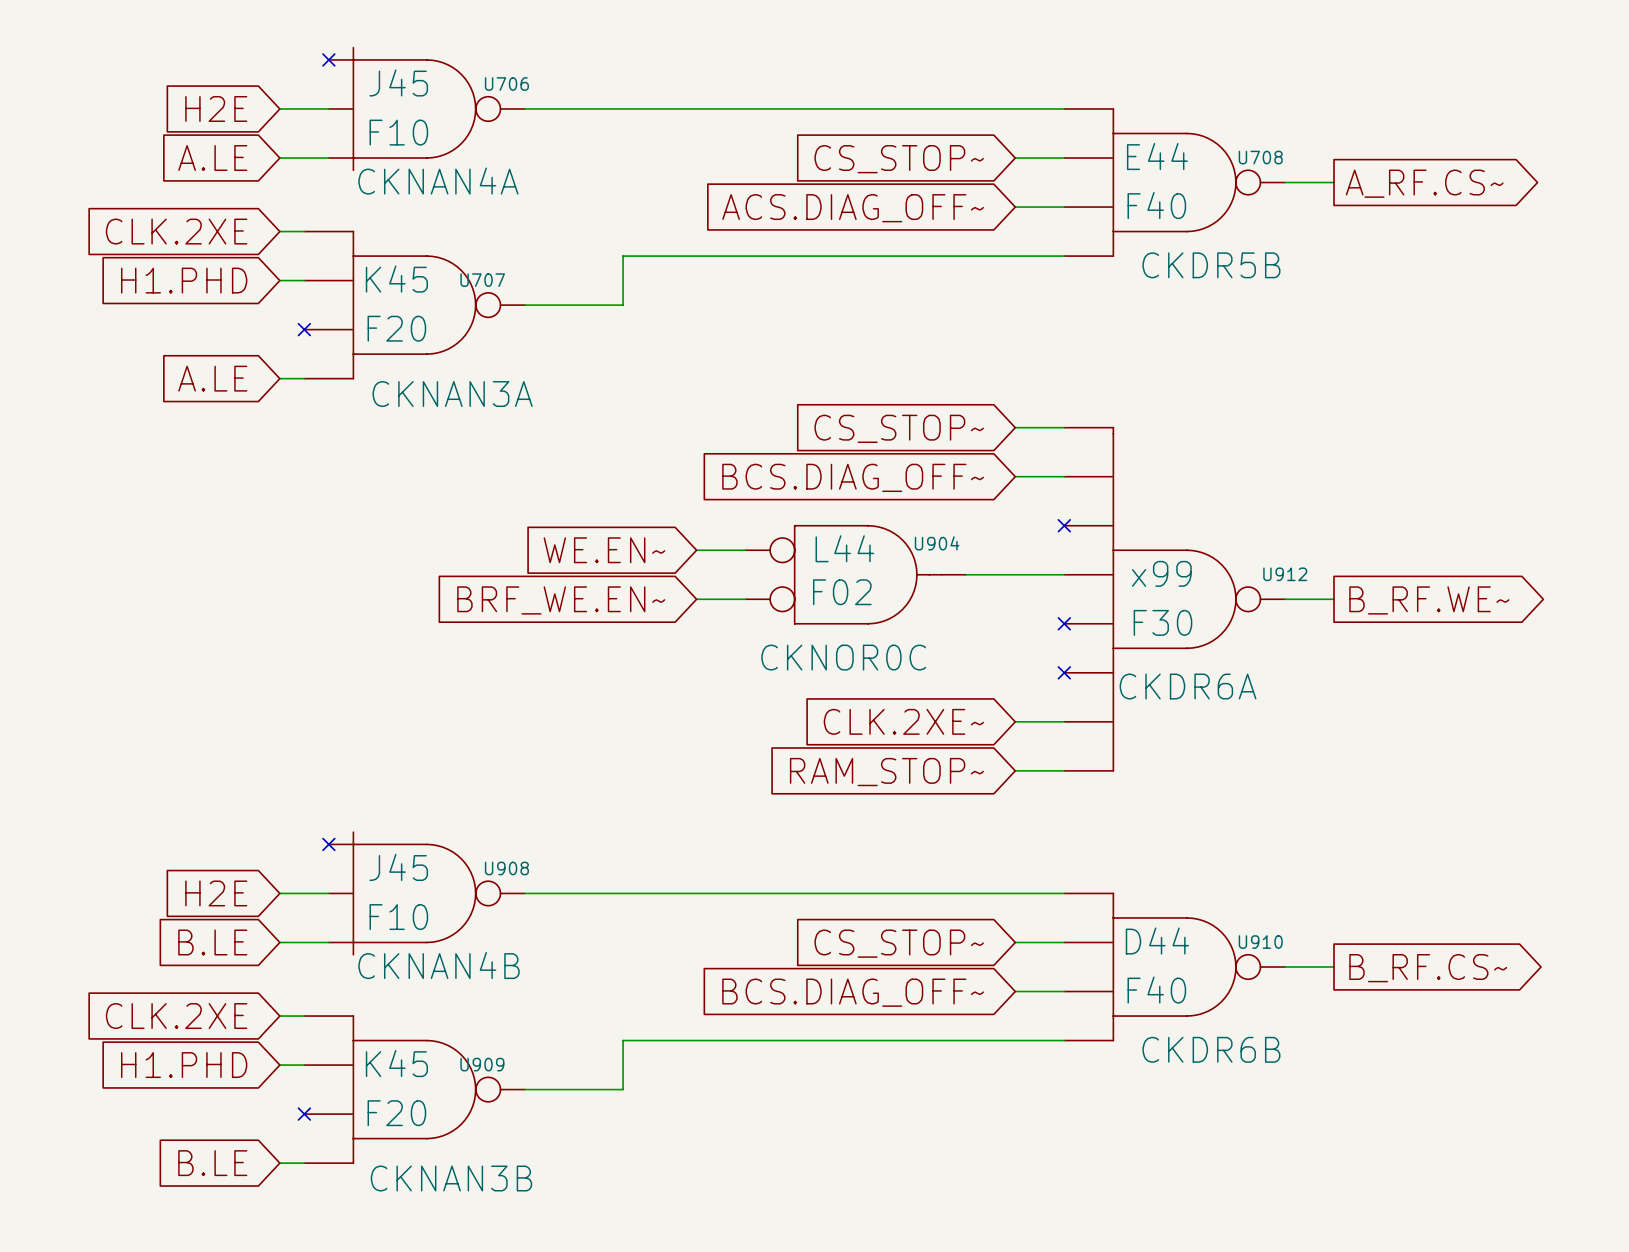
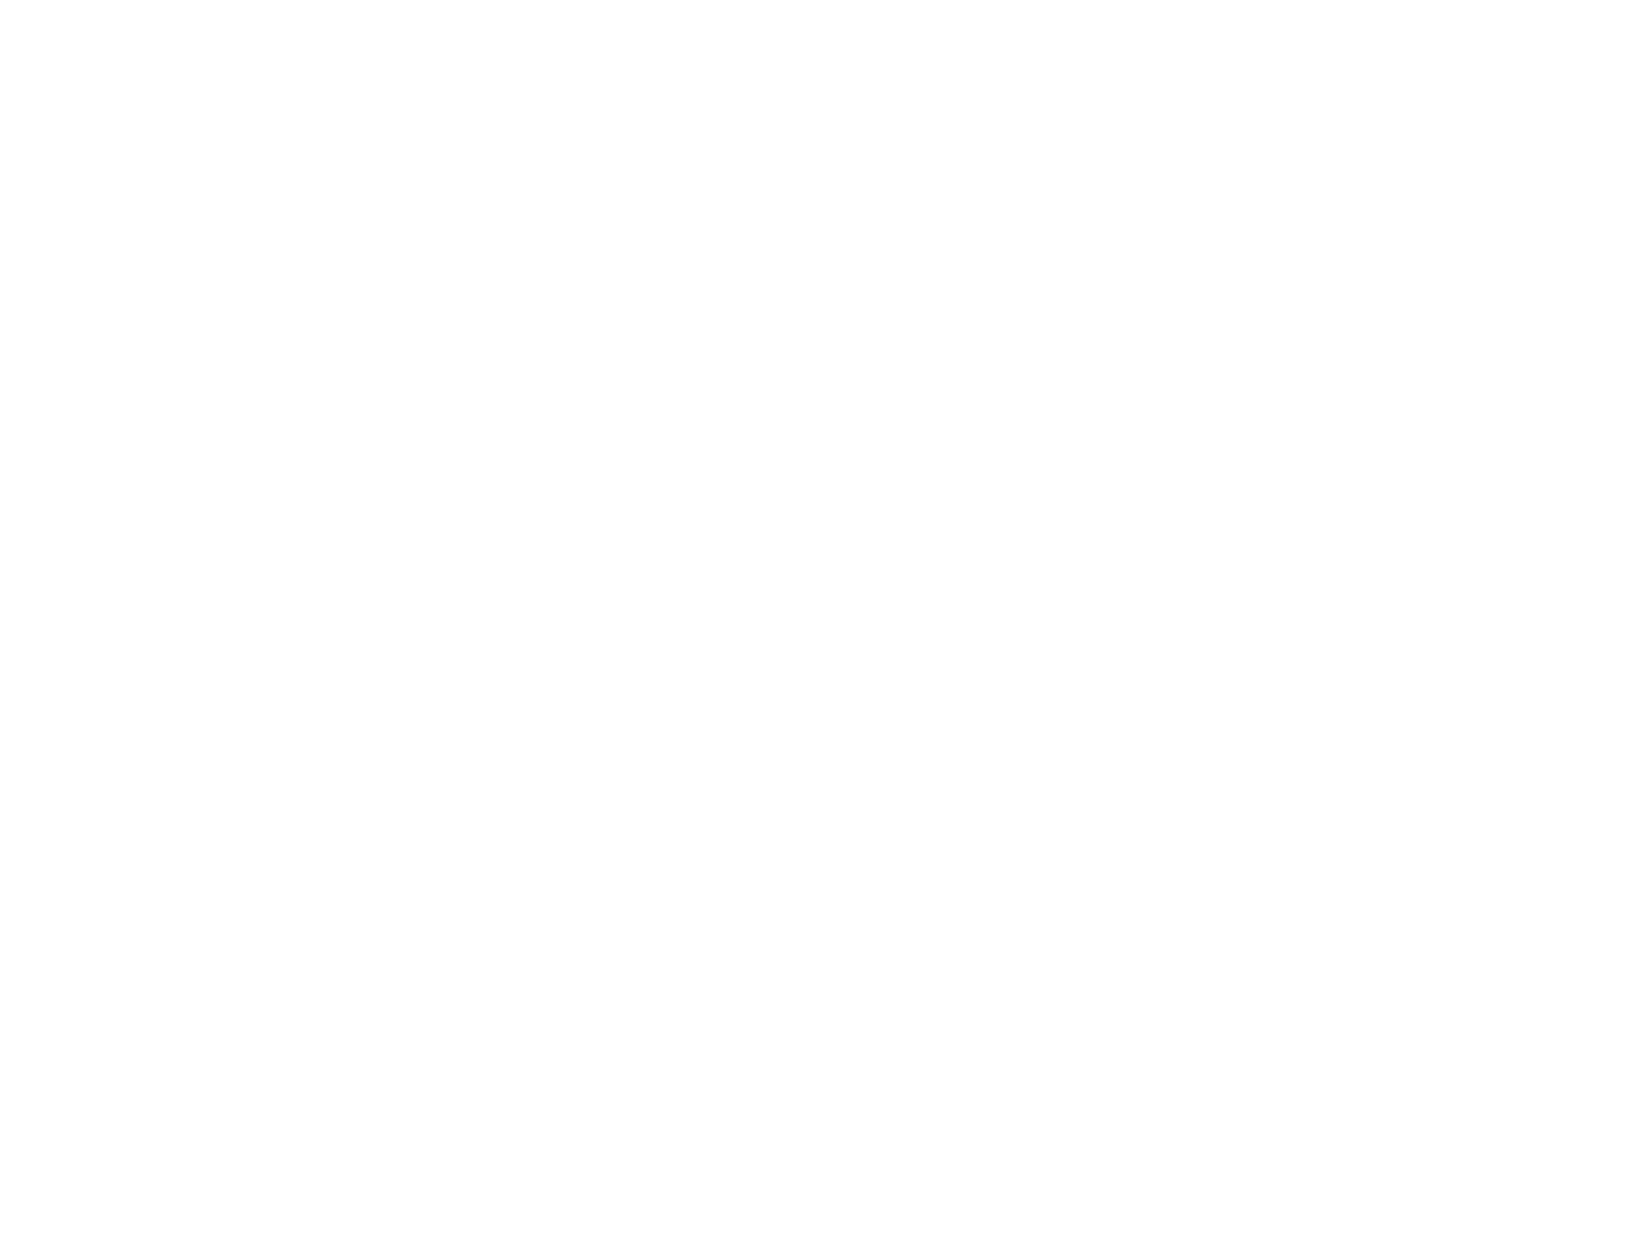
no-connect mark: (328, 59) -> none
global label: H2E (216, 108) -> none
wire: (279, 108) (328, 108) -> none
U706: F10 (426, 108) -> none
wire: (525, 108) (1064, 108) -> none
global label: A.LE (212, 158) -> none
wire: (279, 158) (328, 158) -> none
wire: (1015, 158) (1064, 158) -> none
global label: CS_STOP~ (899, 159) -> none
U708: F40 (1174, 182) -> none
wire: (1284, 182) (1333, 182) -> none
global label: A_RF.CS~ (1424, 183) -> none
wire: (1015, 207) (1064, 207) -> none
global label: ACS.DIAG_OFF~ (853, 208) -> none
global label: CLK.2XE (176, 231) -> none
wire: (279, 231) (304, 231) -> none
wire: (1064, 256) (623, 256) (623, 305) (525, 305) -> none
global label: H1.PHD (184, 280) -> none
wire: (279, 280) (304, 280) -> none
U707: F20 (414, 305) -> none
no-connect mark: (304, 329) -> none
global label: A.LE (212, 378) -> none
wire: (279, 378) (304, 378) -> none
wire: (1015, 427) (1064, 427) -> none
global label: CS_STOP~ (899, 428) -> none
wire: (1015, 476) (1064, 476) -> none
global label: BCS.DIAG_OFF~ (853, 477) -> none
no-connect mark: (1064, 525) -> none
global label: WE.EN~ (604, 550) -> none
wire: (696, 550) (745, 550) -> none
U904: F02 (855, 574) -> none
wire: (966, 574) (1064, 574) -> none
wire: (696, 599) (745, 599) -> none
U912: F30 (1174, 599) -> none
wire: (1284, 599) (1333, 599) -> none
global label: BRF_WE.EN~ (561, 600) -> none
global label: B_RF.WE~ (1429, 600) -> none
no-connect mark: (1064, 623) -> none
no-connect mark: (1064, 672) -> none
global label: CLK.2XE~ (903, 721) -> none
wire: (1015, 721) (1064, 721) -> none
wire: (1015, 770) (1064, 770) -> none
global label: RAM_STOP~ (886, 772) -> none
no-connect mark: (328, 844) -> none
global label: H2E (216, 893) -> none
wire: (279, 893) (328, 893) -> none
U908: F10 (426, 893) -> none
wire: (525, 893) (1064, 893) -> none
global label: B.LE (212, 942) -> none
wire: (279, 942) (328, 942) -> none
wire: (1015, 942) (1064, 942) -> none
global label: CS_STOP~ (899, 943) -> none
U910: F40 (1174, 967) -> none
wire: (1284, 967) (1333, 967) -> none
global label: B_RF.CS~ (1428, 968) -> none
wire: (1015, 991) (1064, 991) -> none
global label: BCS.DIAG_OFF~ (853, 992) -> none
global label: CLK.2XE (176, 1016) -> none
wire: (279, 1016) (304, 1016) -> none
wire: (1064, 1040) (623, 1040) (623, 1089) (525, 1089) -> none
global label: H1.PHD (184, 1065) -> none
wire: (279, 1065) (304, 1065) -> none
U909: F20 (414, 1089) -> none
no-connect mark: (304, 1114) -> none
global label: B.LE (212, 1163) -> none
wire: (279, 1163) (304, 1163) -> none

